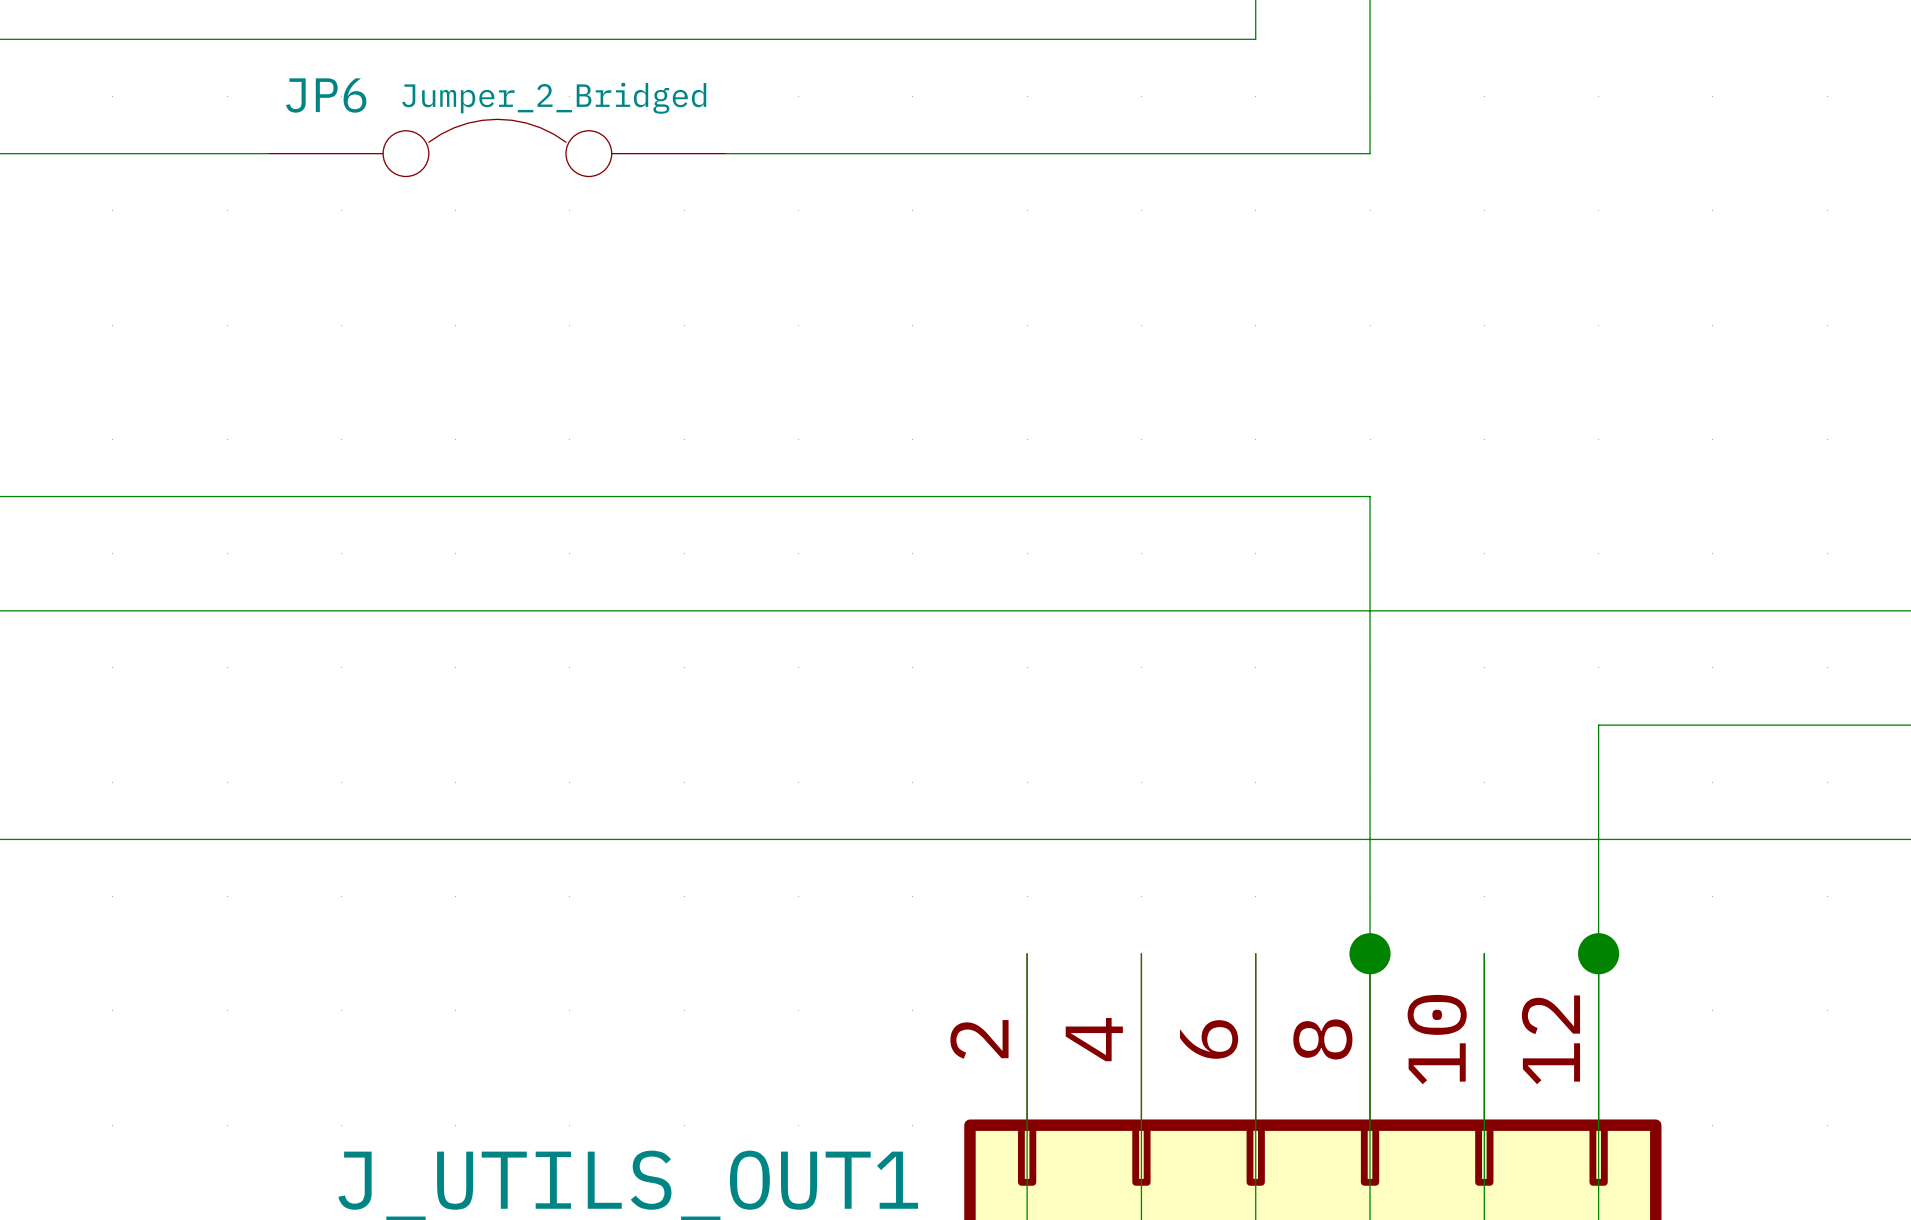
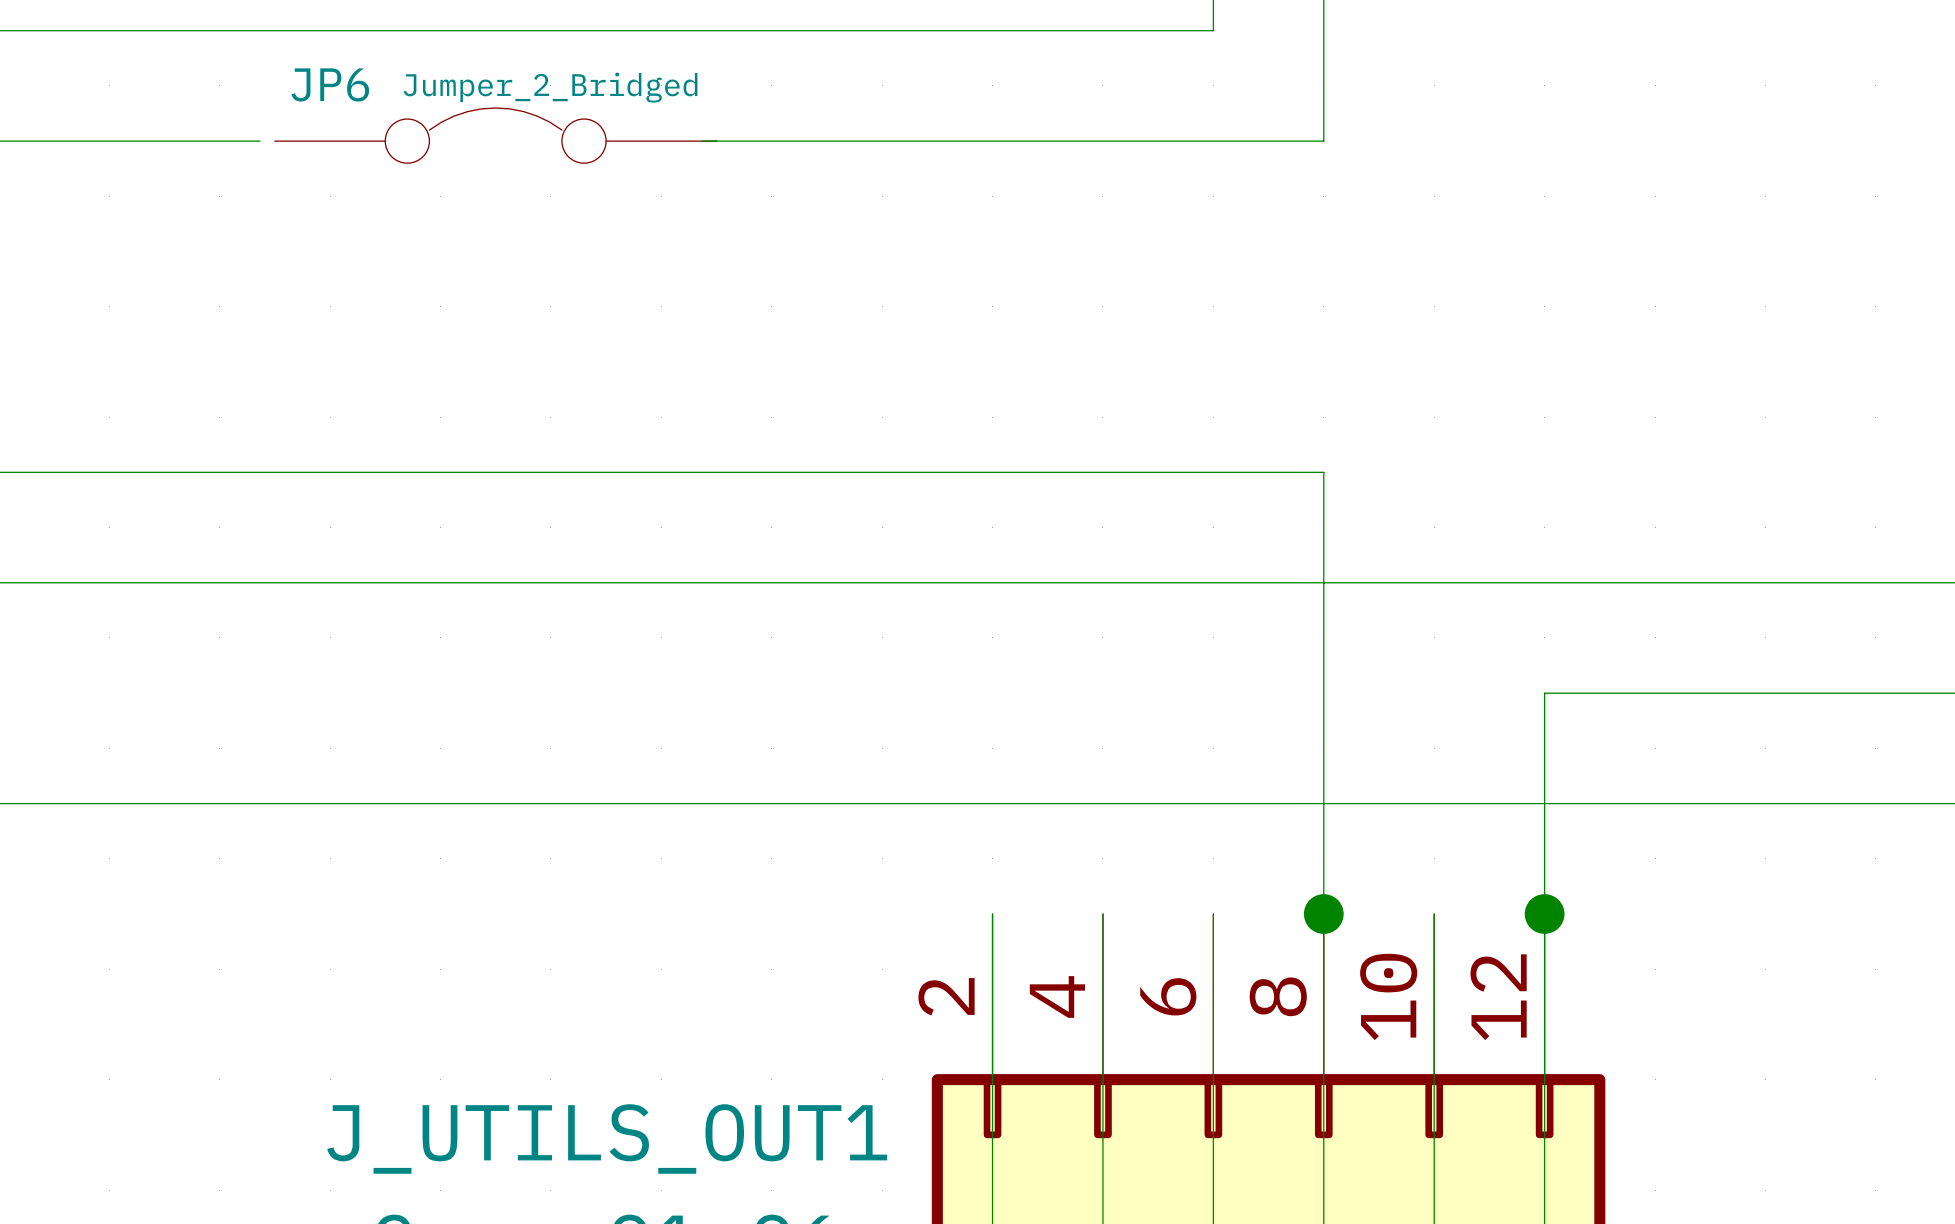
JP6 position: (497, 147) -> (495, 135)

